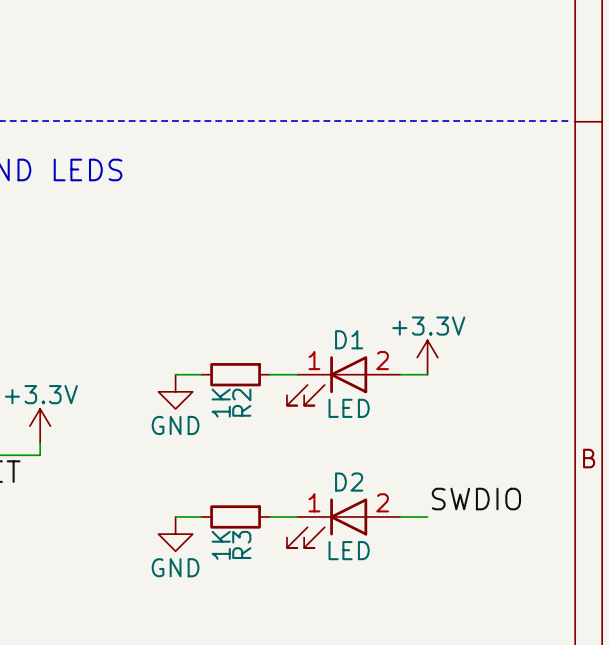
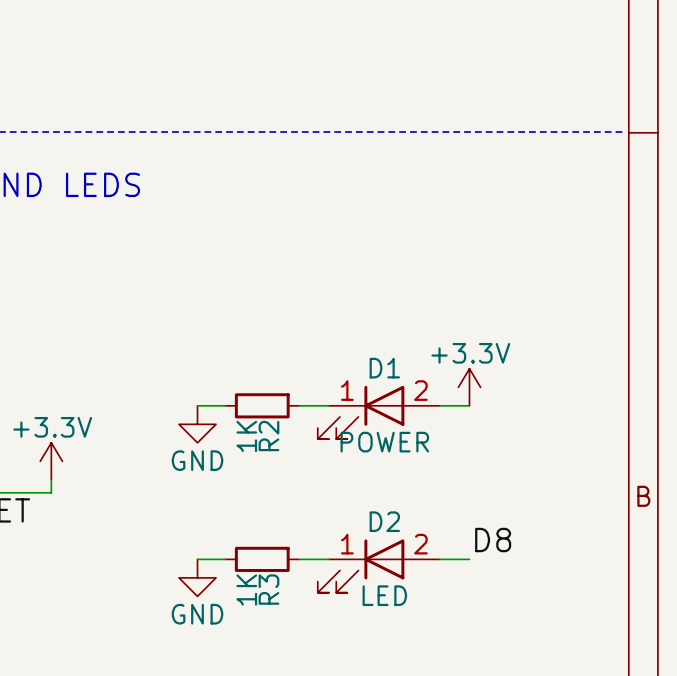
D1 value: LED (349, 408) -> POWER (384, 442)
label: SWDIO (476, 499) -> D8 (493, 540)

